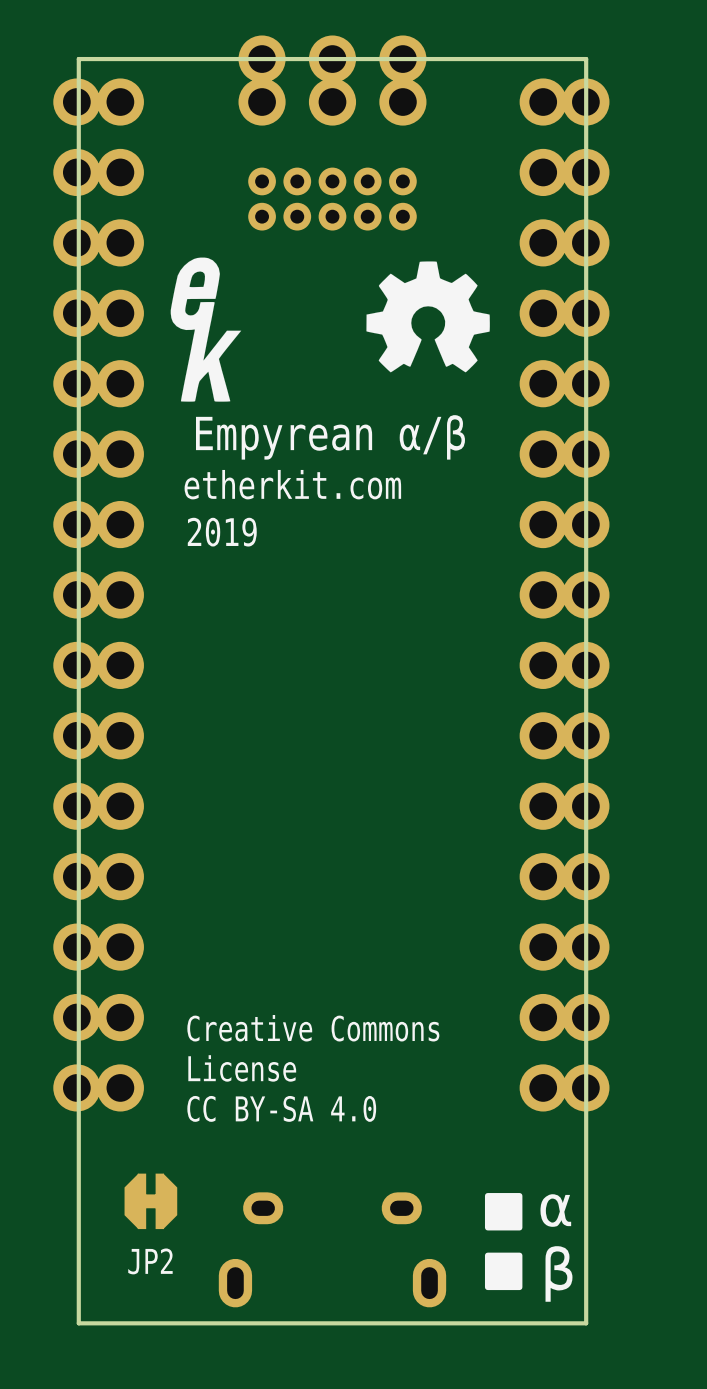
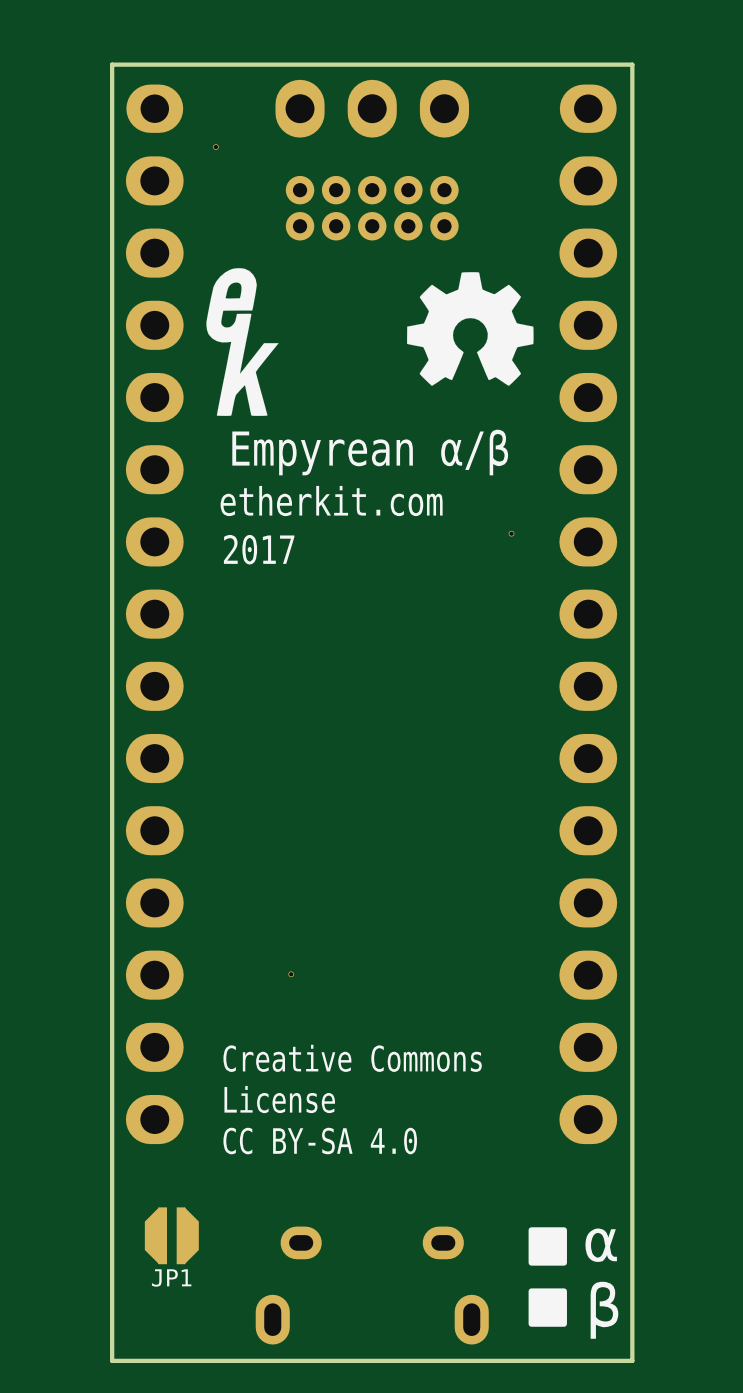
part: (332, 59) -> none
part footprint: [96, 78, 144, 1112] -> [125, 84, 184, 1145]
part footprint: [238, 78, 427, 126] -> [275, 79, 469, 138]
part footprint: [519, 78, 567, 1112] -> [559, 84, 618, 1145]
part: none -> (215, 147)
part: none -> (511, 533)
text: 2019 (222, 532) -> 2017 (259, 549)
part: (76, 594) -> none
part: (585, 594) -> none
part: none -> (291, 974)
JP1: none -> (171, 1235)
JP2: (150, 1201) -> none

